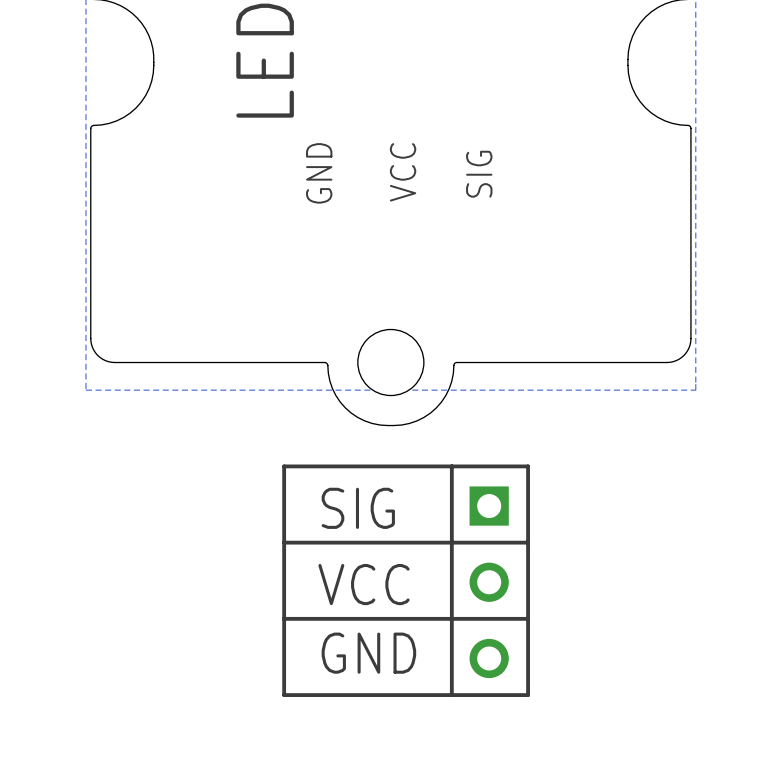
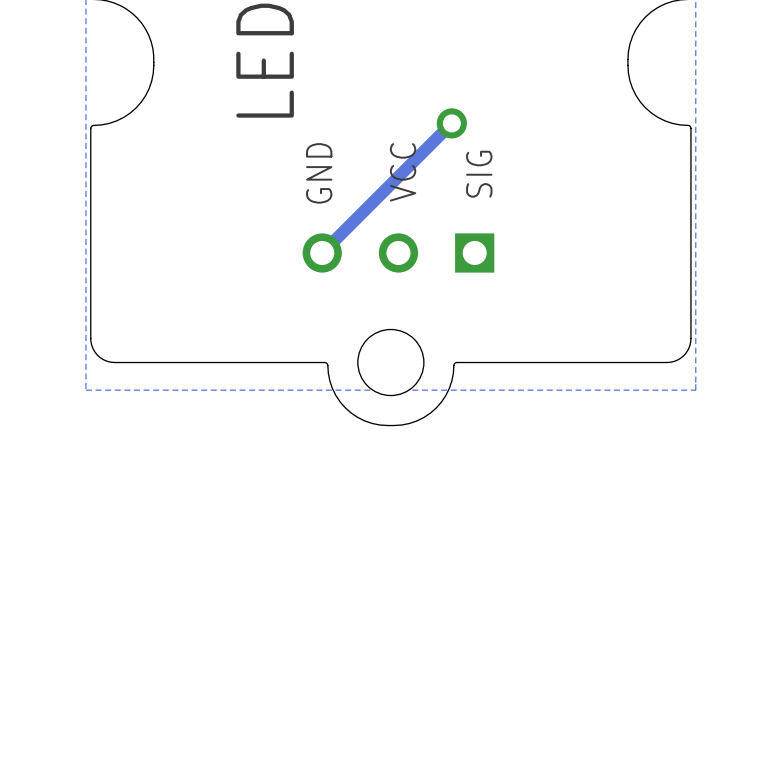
track: none -> (451, 123) (322, 252)
via: none -> (451, 123)
part: none -> (398, 252)
part: (406, 580) -> none

